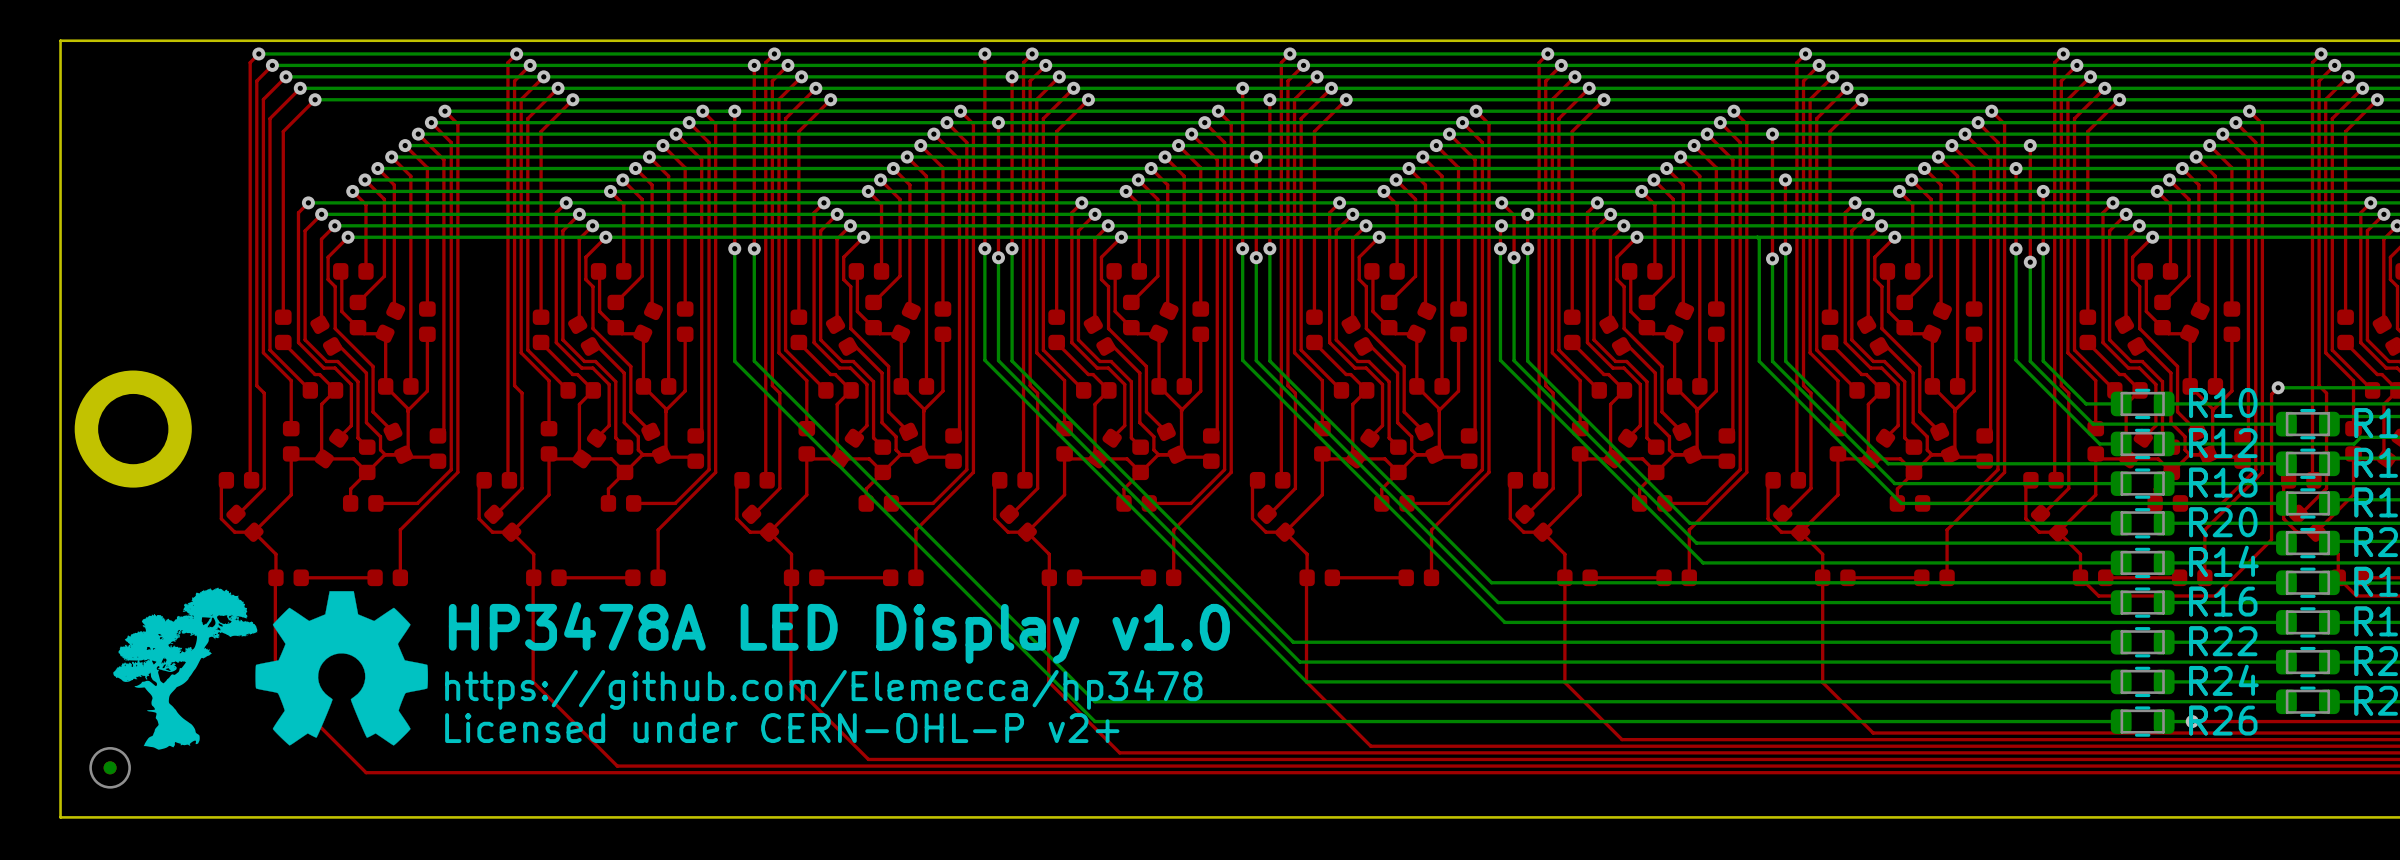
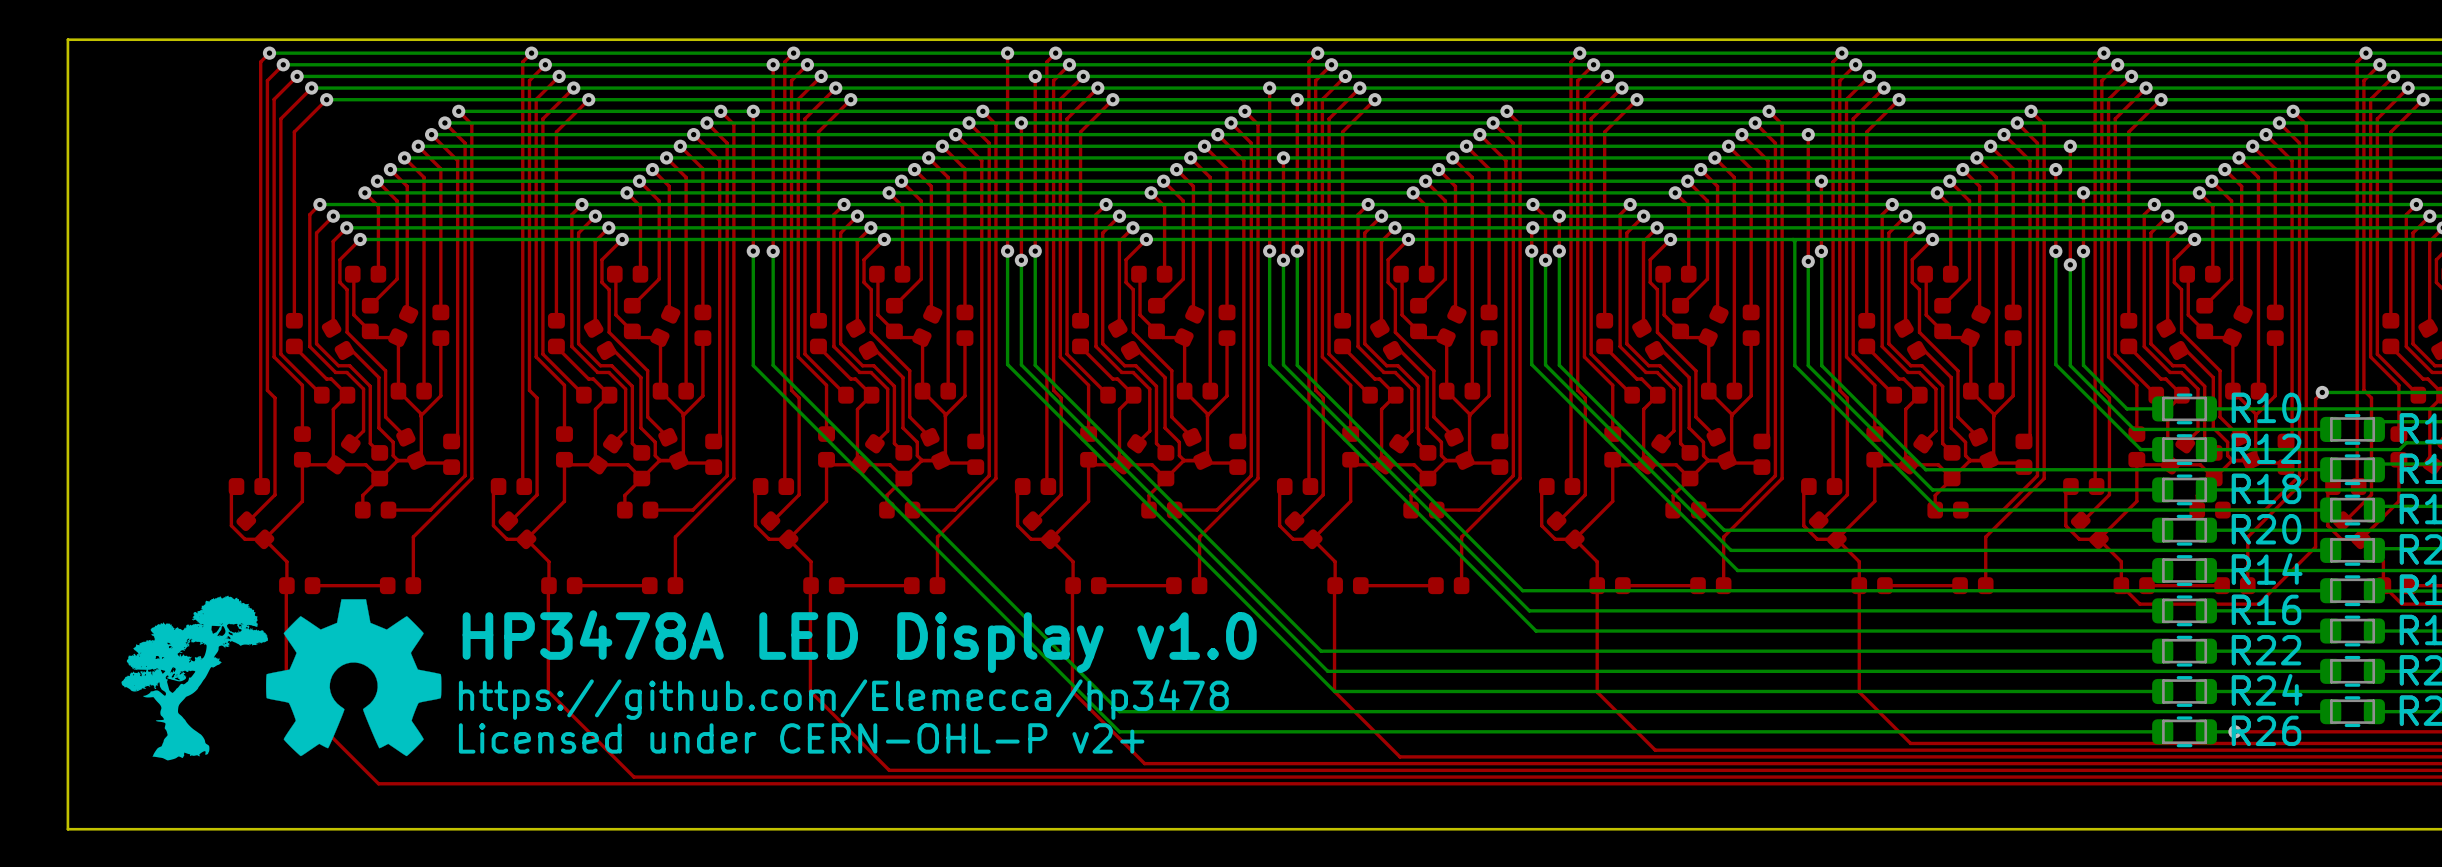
part: (133, 429) -> none
part: (110, 767) -> none

